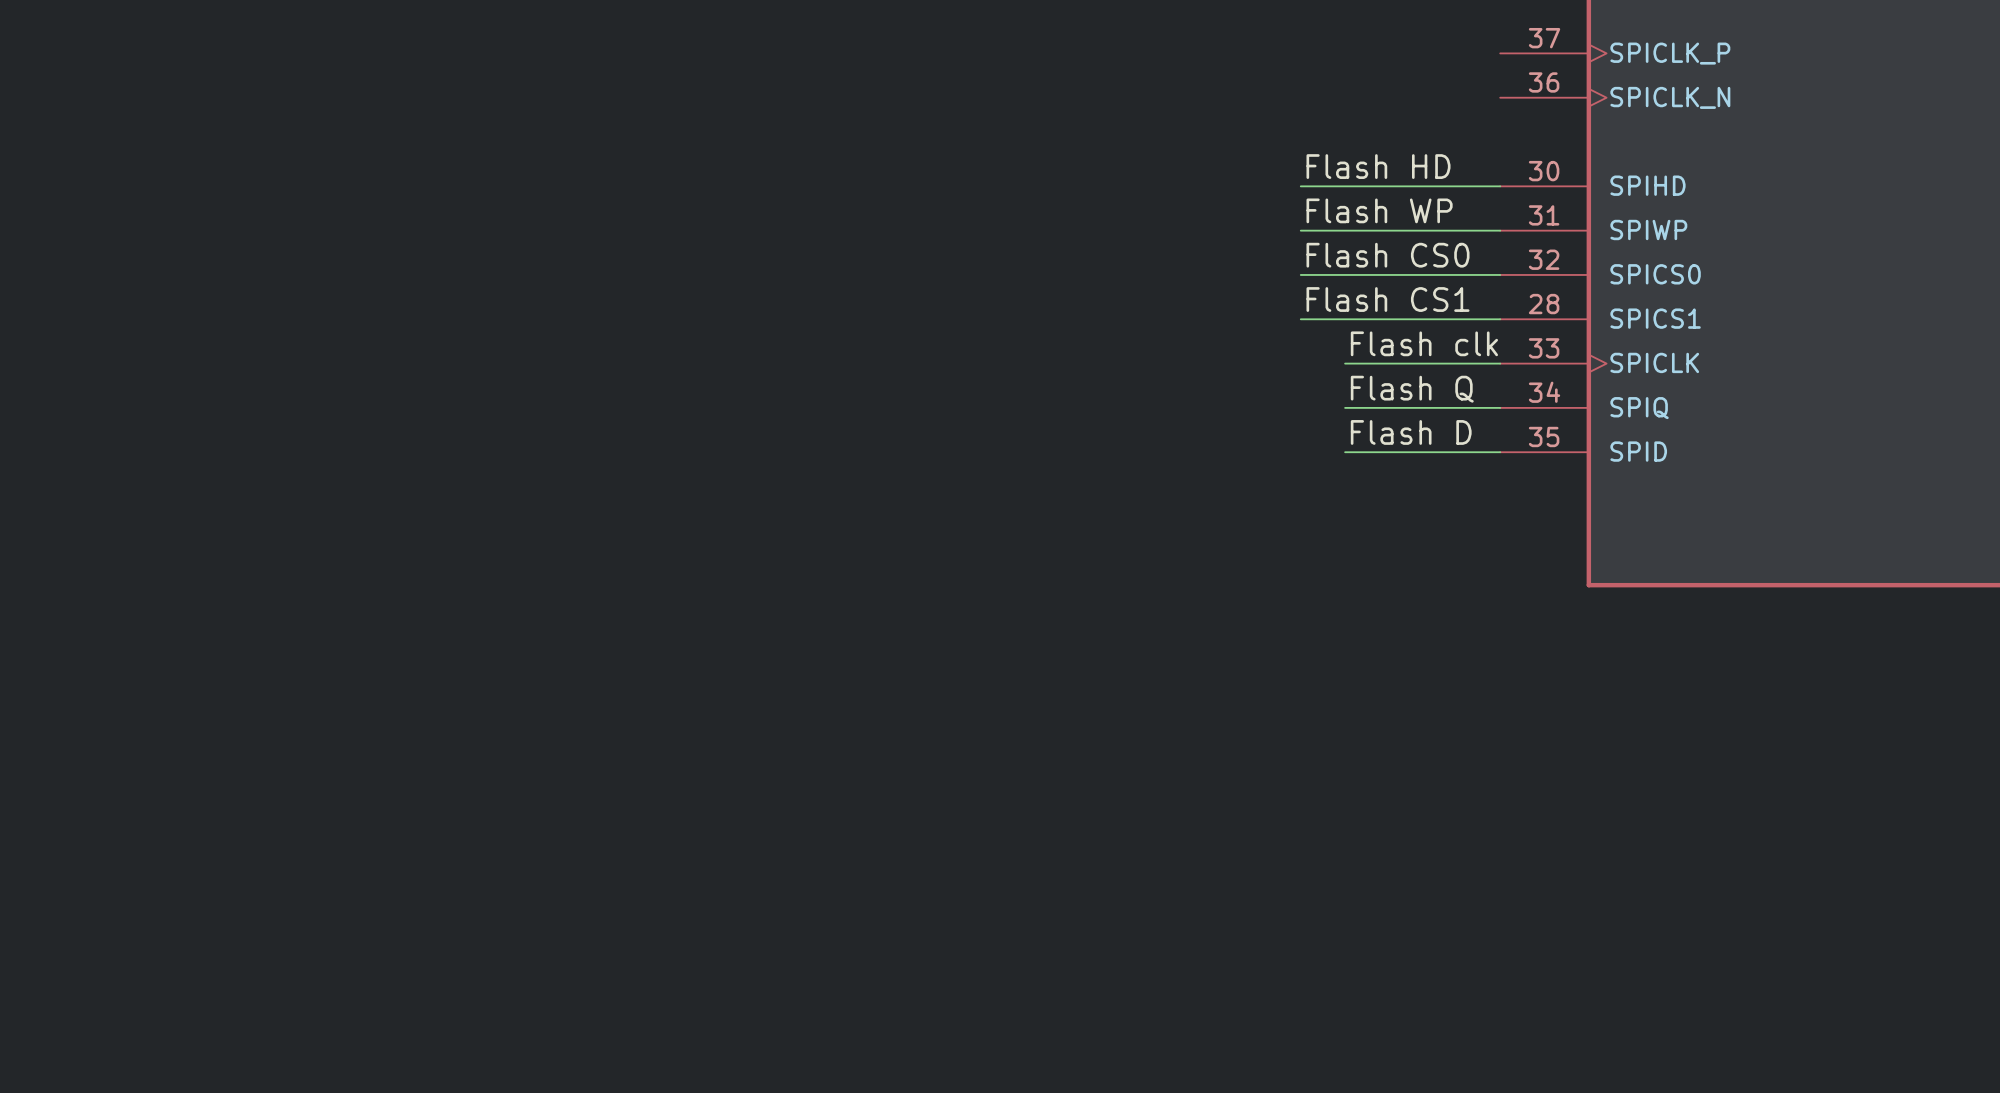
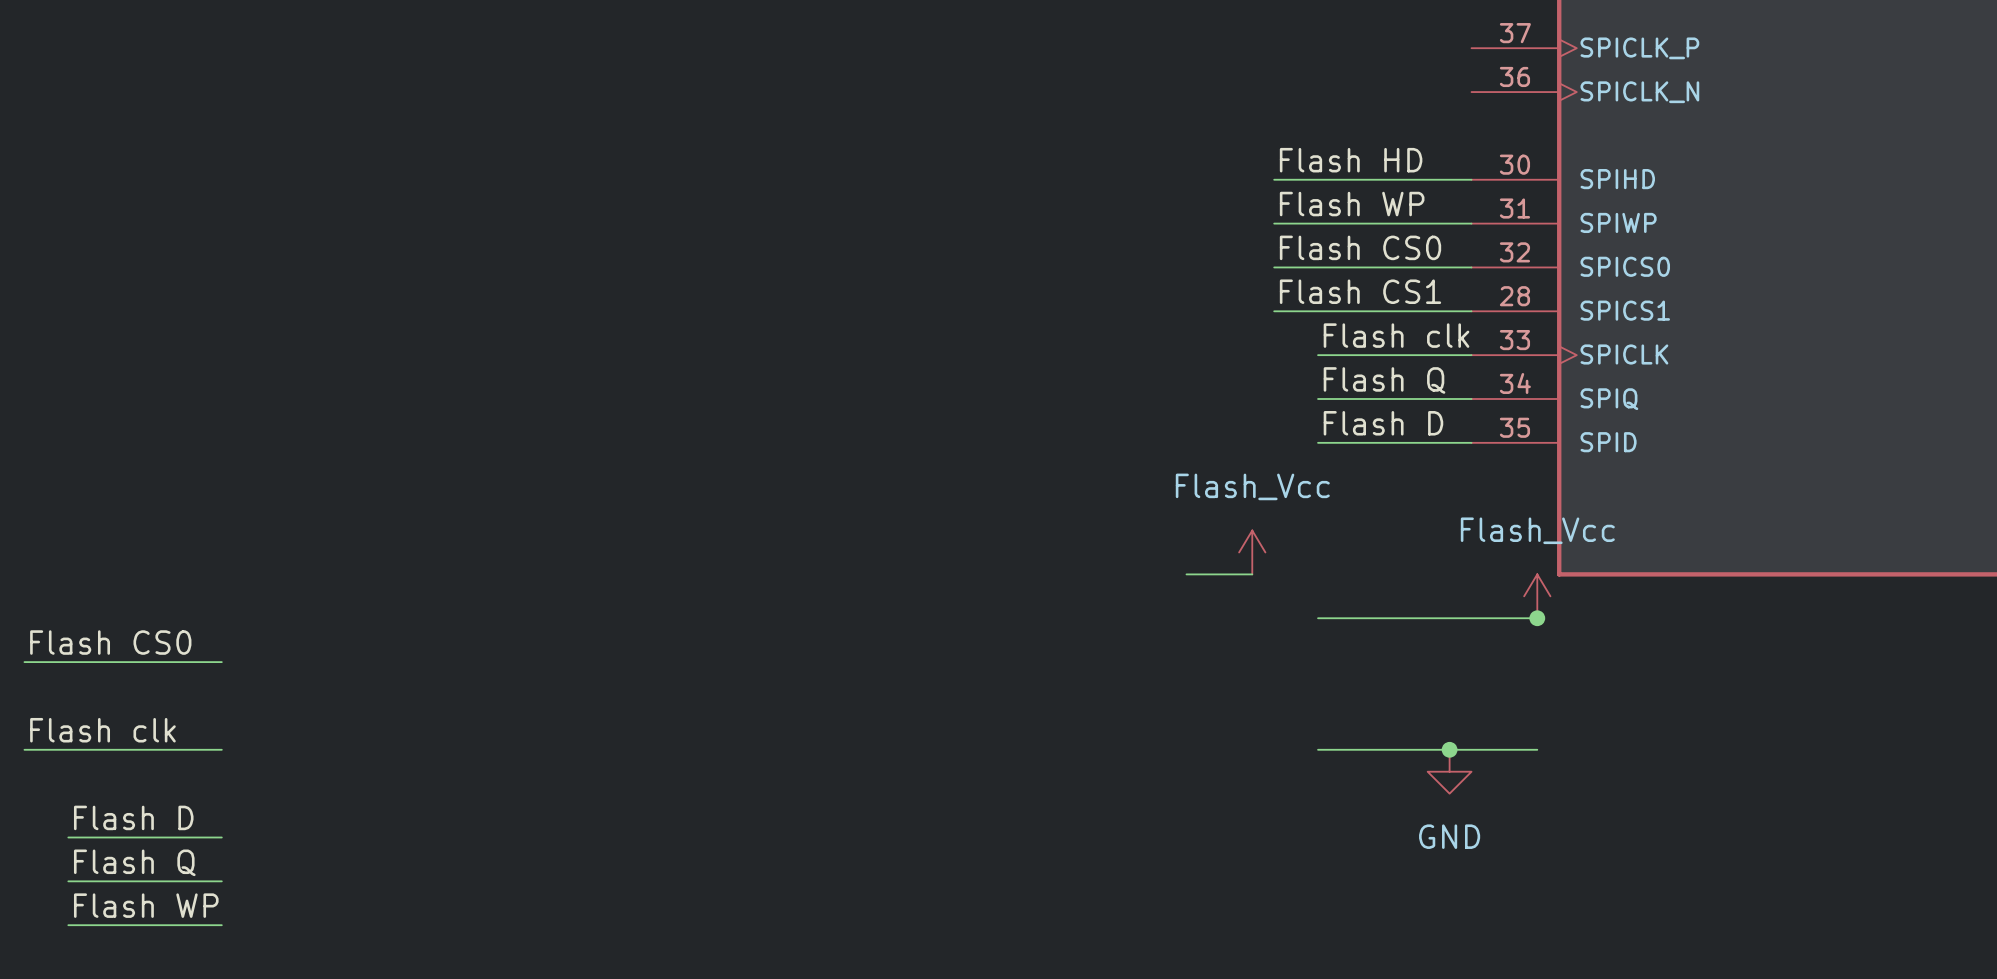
power symbol: none -> Flash_Vcc (1252, 552)
wire: none -> (1186, 574) (1252, 574)
power symbol: none -> Flash_Vcc (1537, 596)
wire: none -> (1318, 618) (1537, 618)
junction: none -> (1537, 618)
label: none -> Flash CS0 (110, 642)
wire: none -> (24, 662) (221, 662)
label: none -> Flash clk (102, 730)
wire: none -> (24, 749) (221, 749)
wire: none -> (1318, 749) (1537, 749)
junction: none -> (1449, 749)
power symbol: none -> GND (1449, 771)
label: none -> Flash D (133, 817)
wire: none -> (68, 837) (221, 837)
label: none -> Flash Q (134, 862)
wire: none -> (68, 881) (221, 881)
label: none -> Flash WP (146, 905)
wire: none -> (68, 925) (221, 925)

